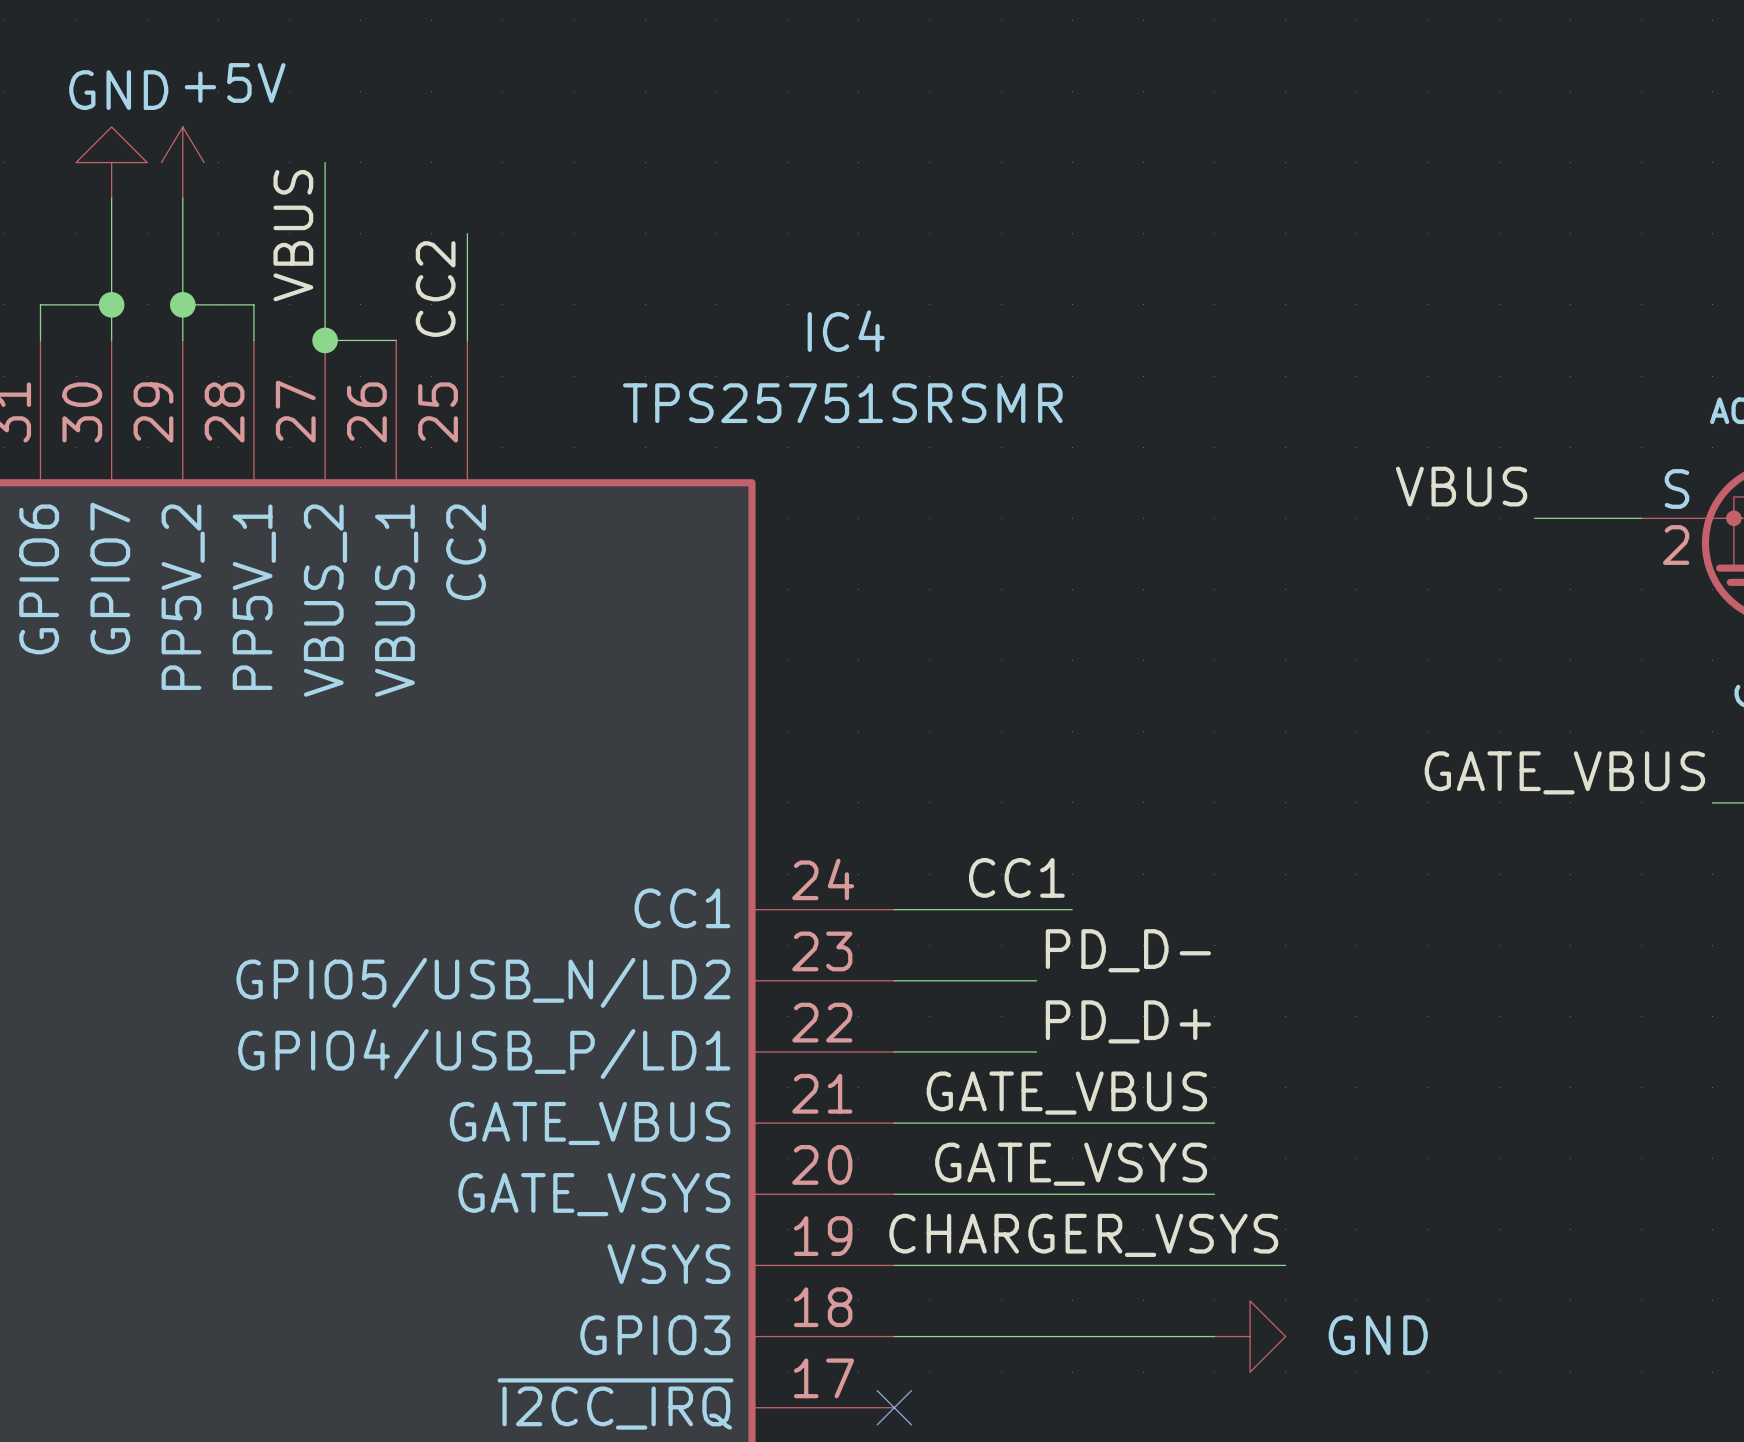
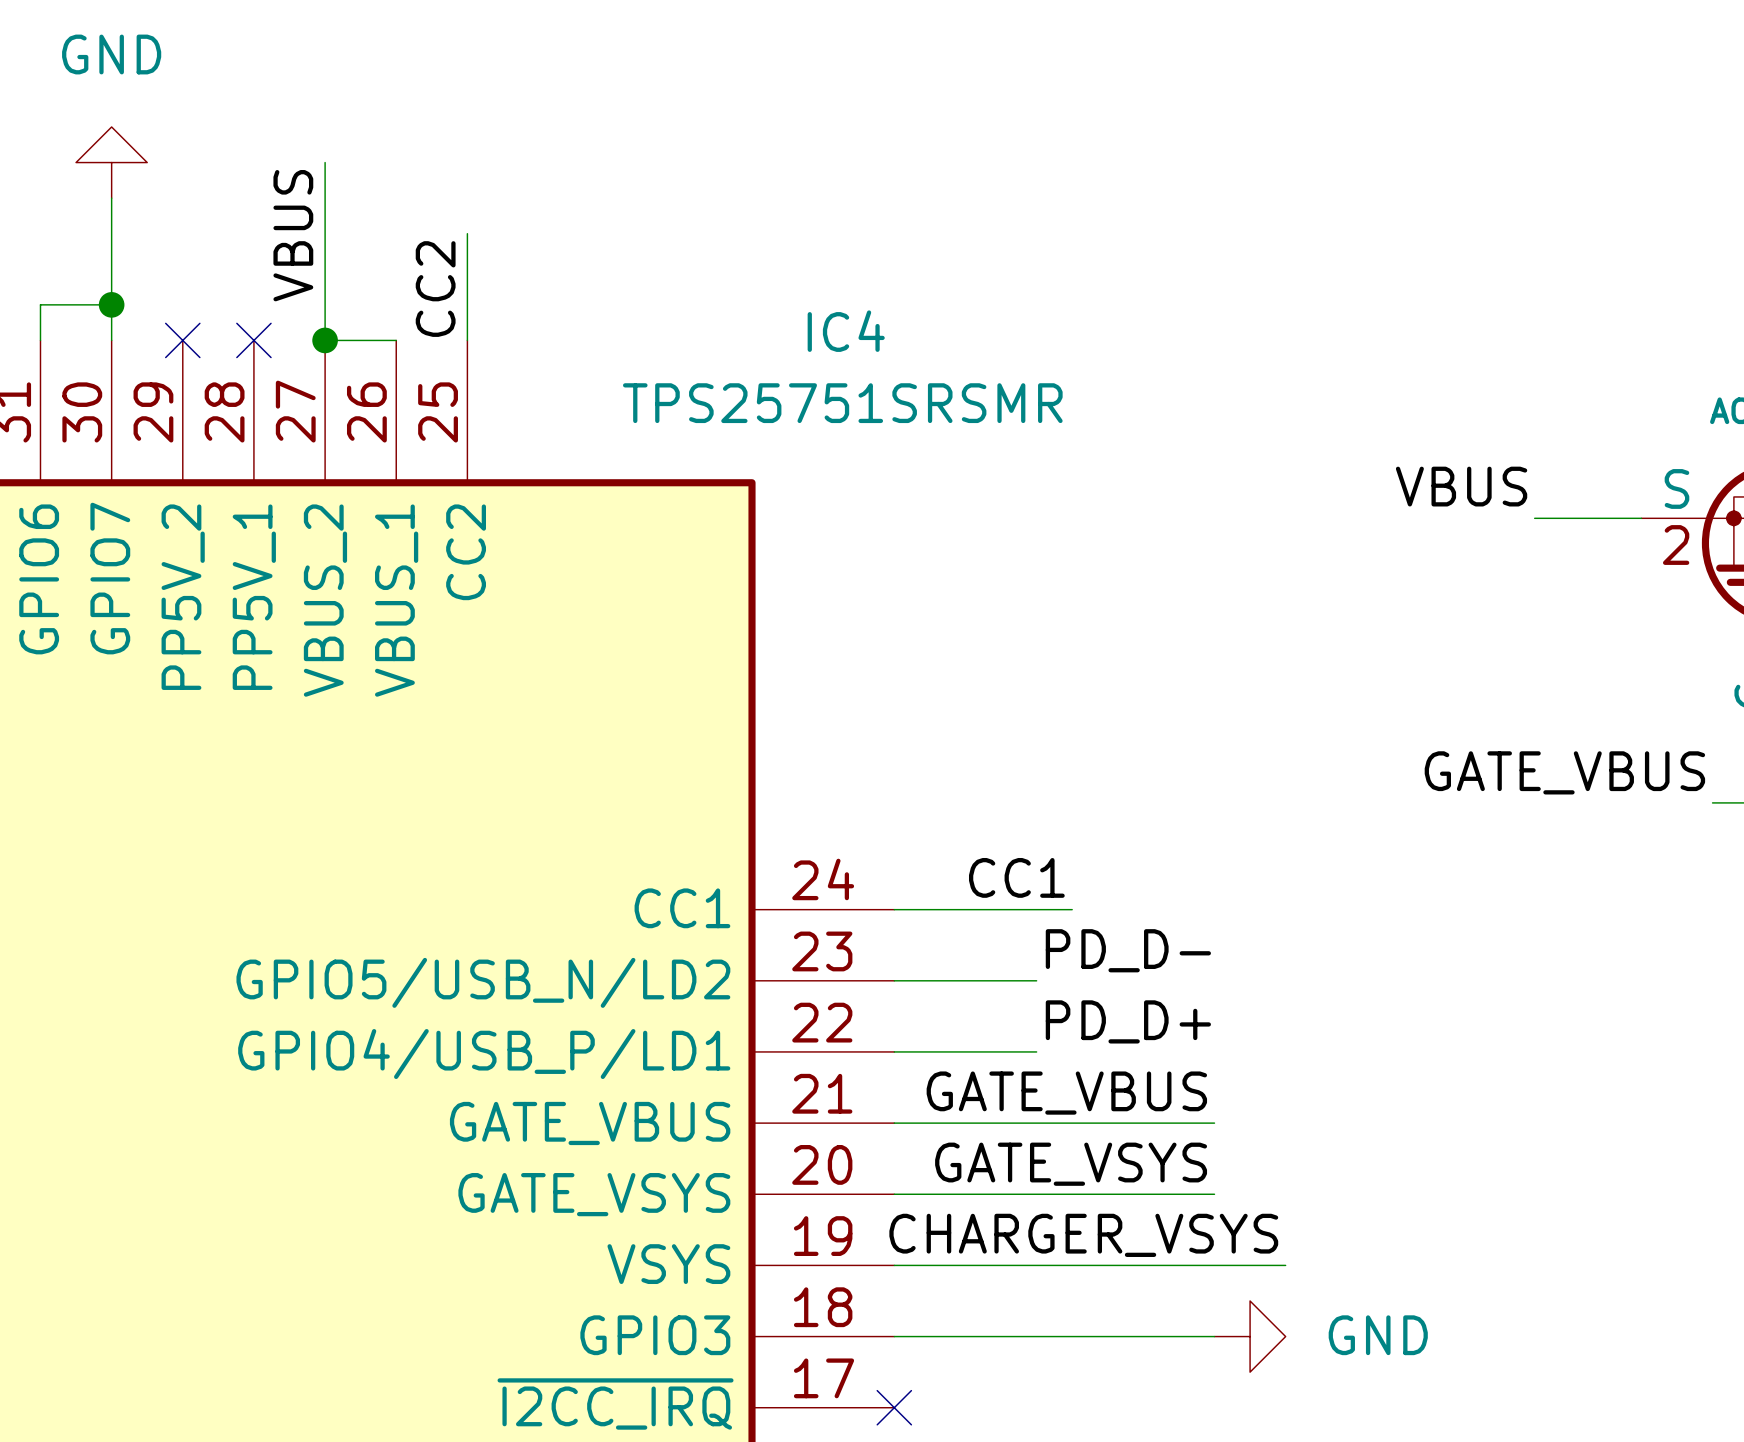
power symbol text position: GND (118, 90) -> GND (111, 54)
power symbol: +5V (182, 162) -> none
wire: (182, 198) (182, 340) -> none
wire: (182, 304) (253, 304) (253, 340) -> none
junction: (182, 304) -> none
no-connect mark: none -> (182, 340)
no-connect mark: none -> (253, 340)

